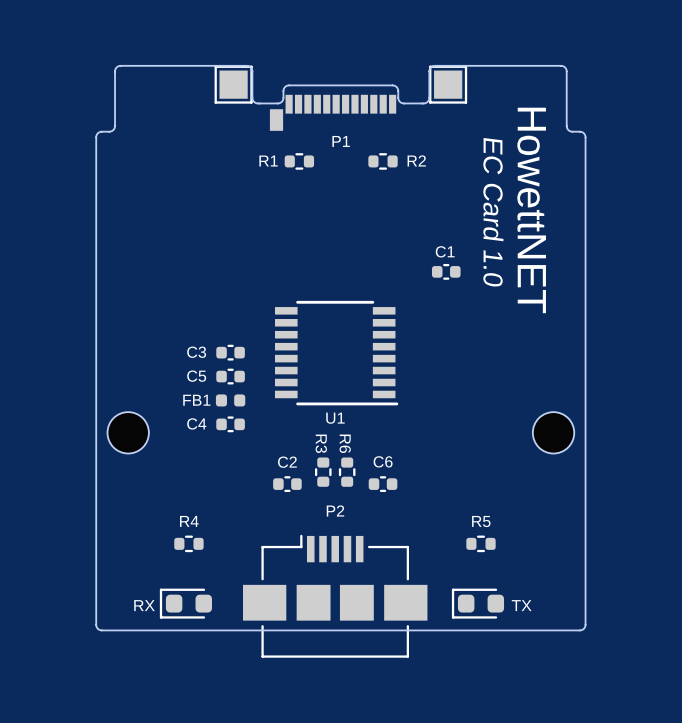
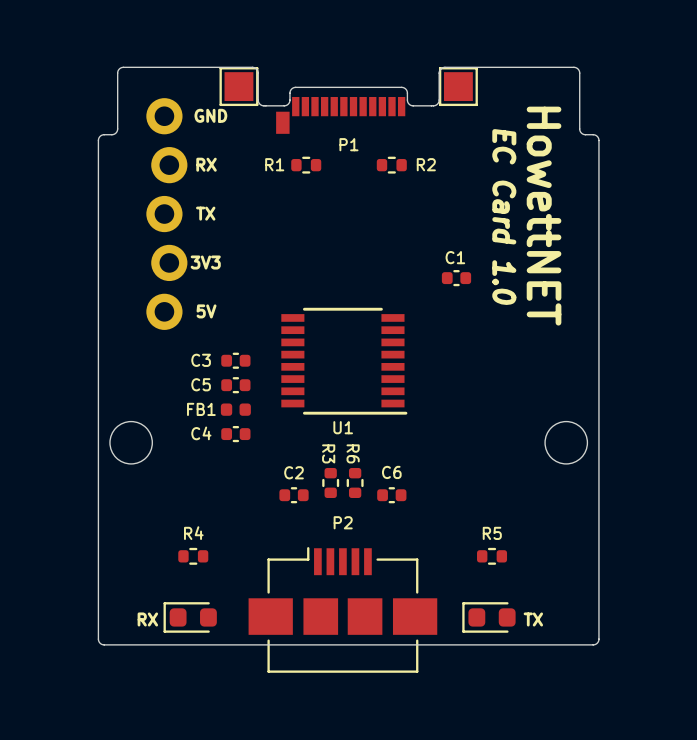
text: none -> GND (210, 115)
text: none -> RX (206, 164)
text: none -> TX (205, 213)
part: none -> (166, 214)
text: none -> 3V3 (205, 262)
text: none -> 5V (206, 311)

